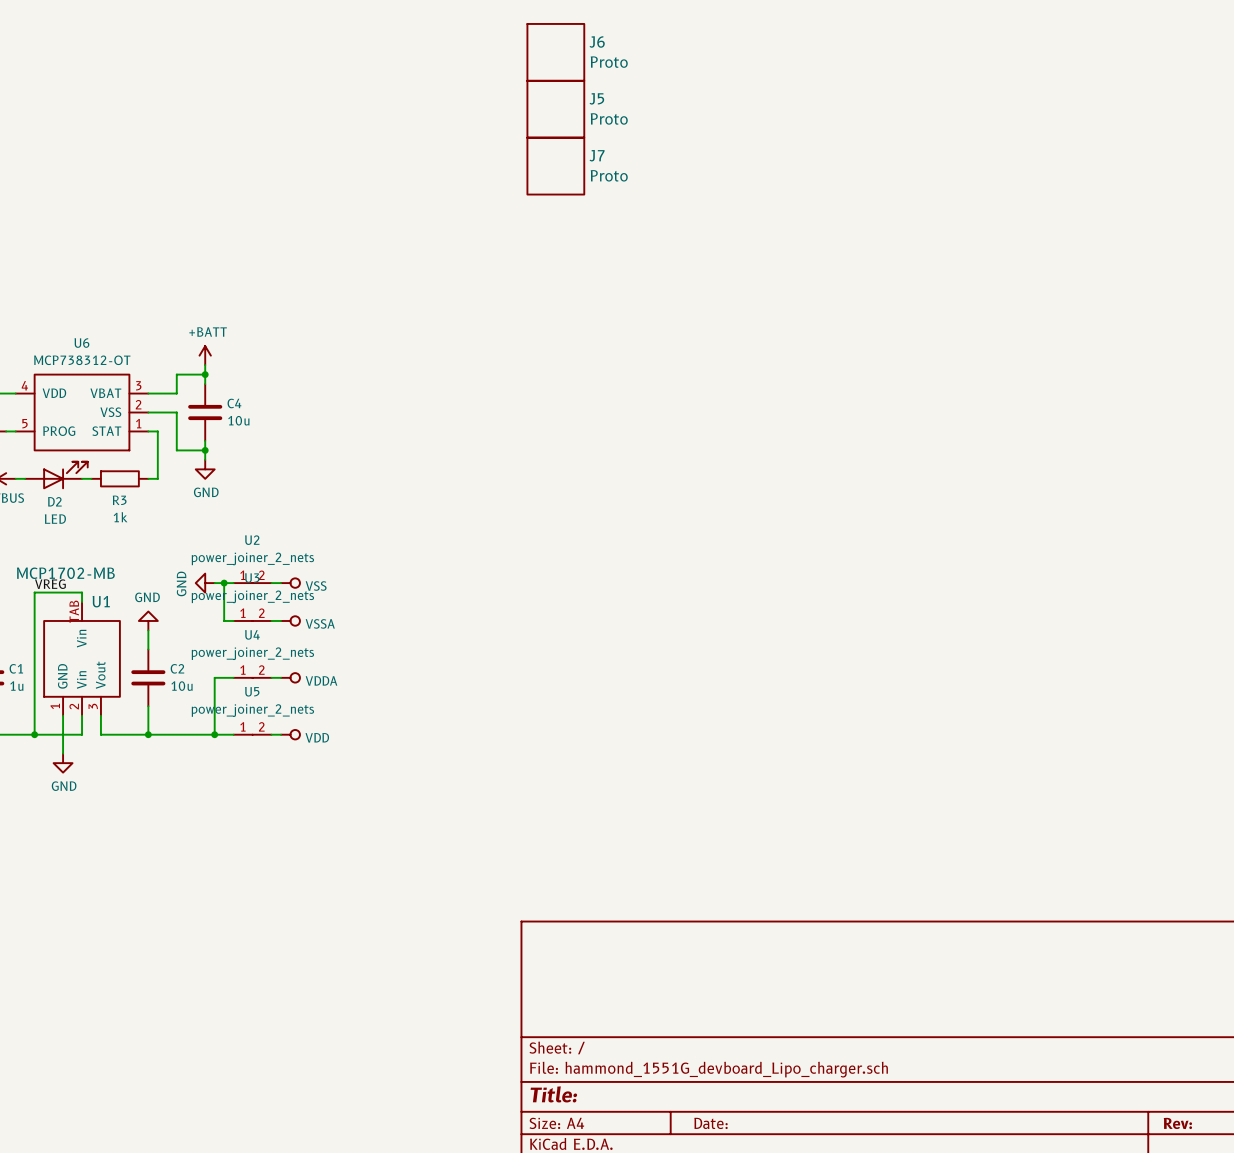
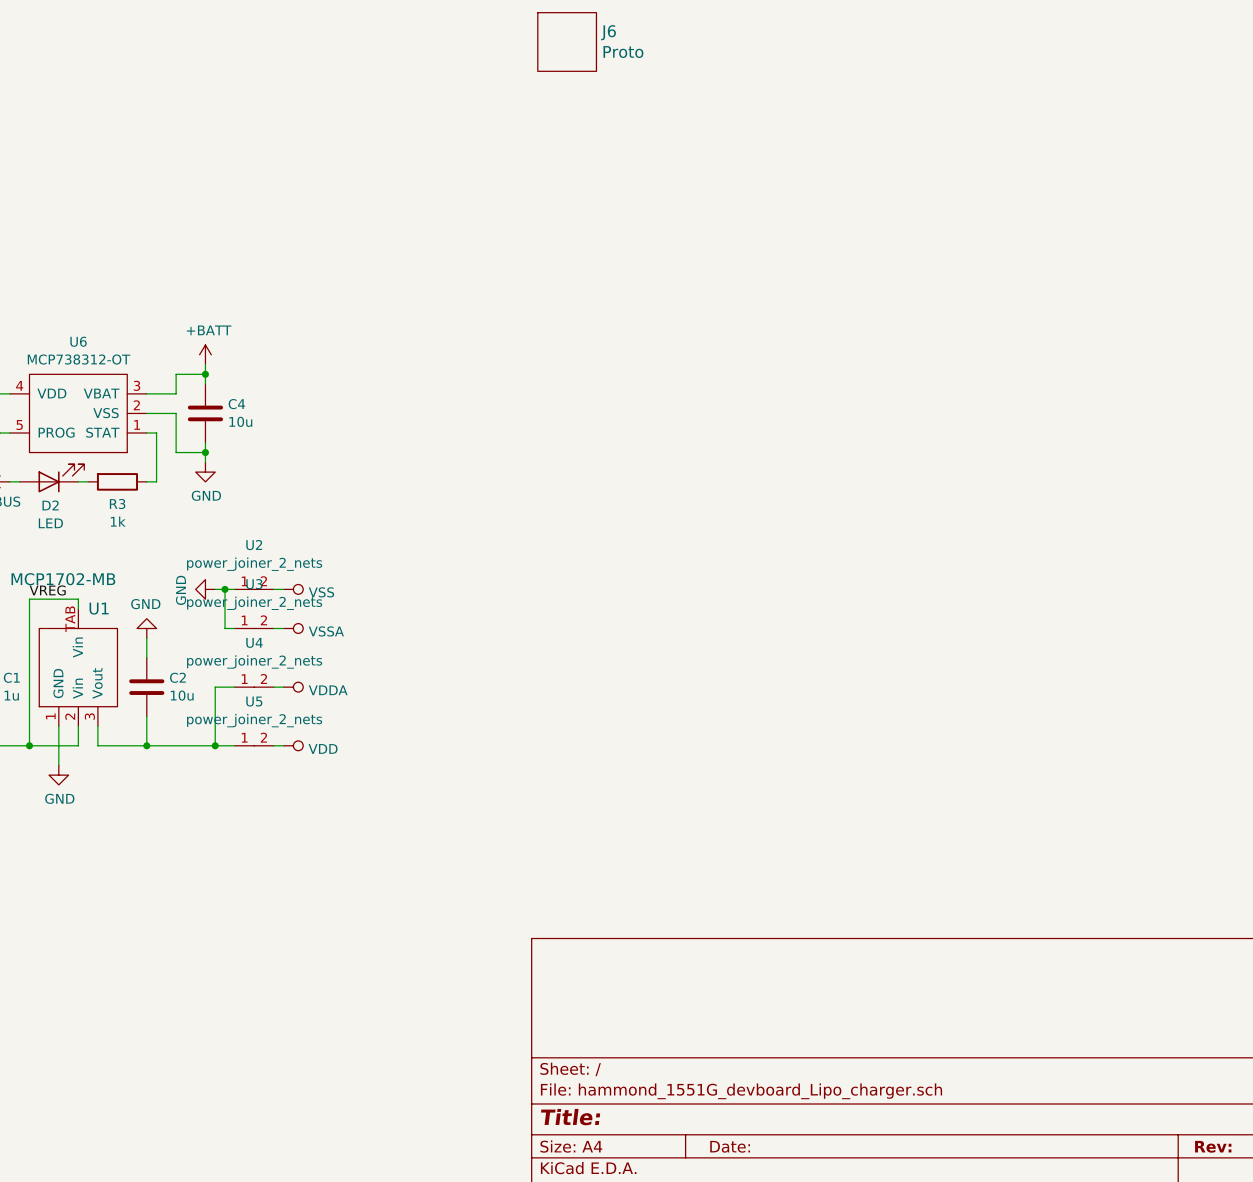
J5: Proto (555, 109) -> none
J7: Proto (555, 166) -> none

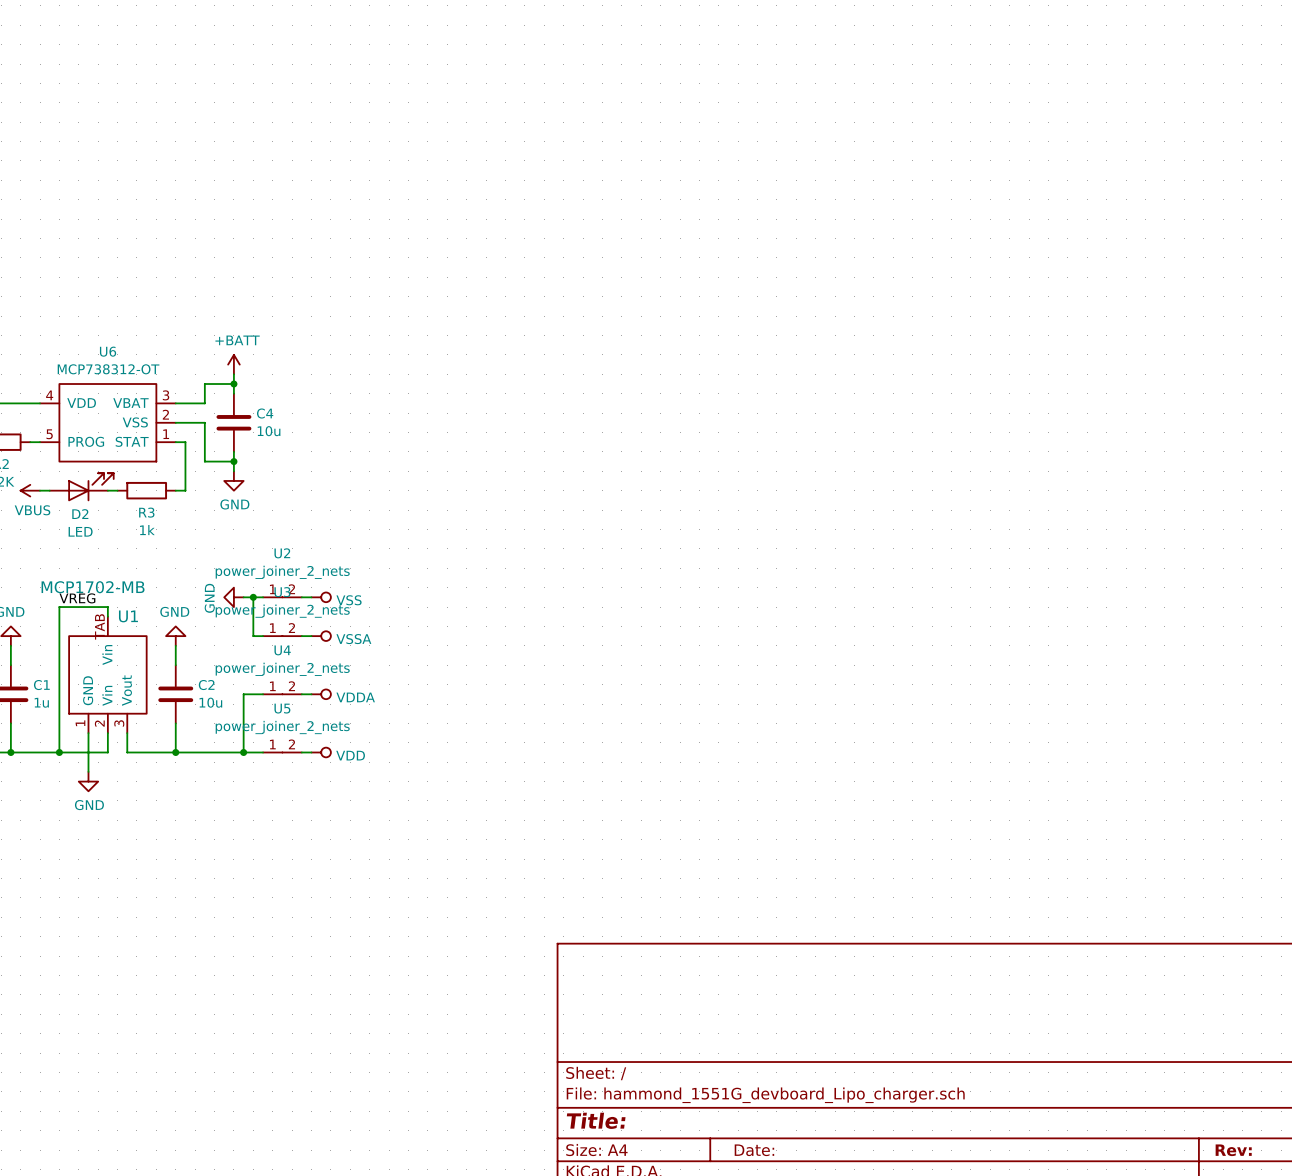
J6: Proto (567, 41) -> none

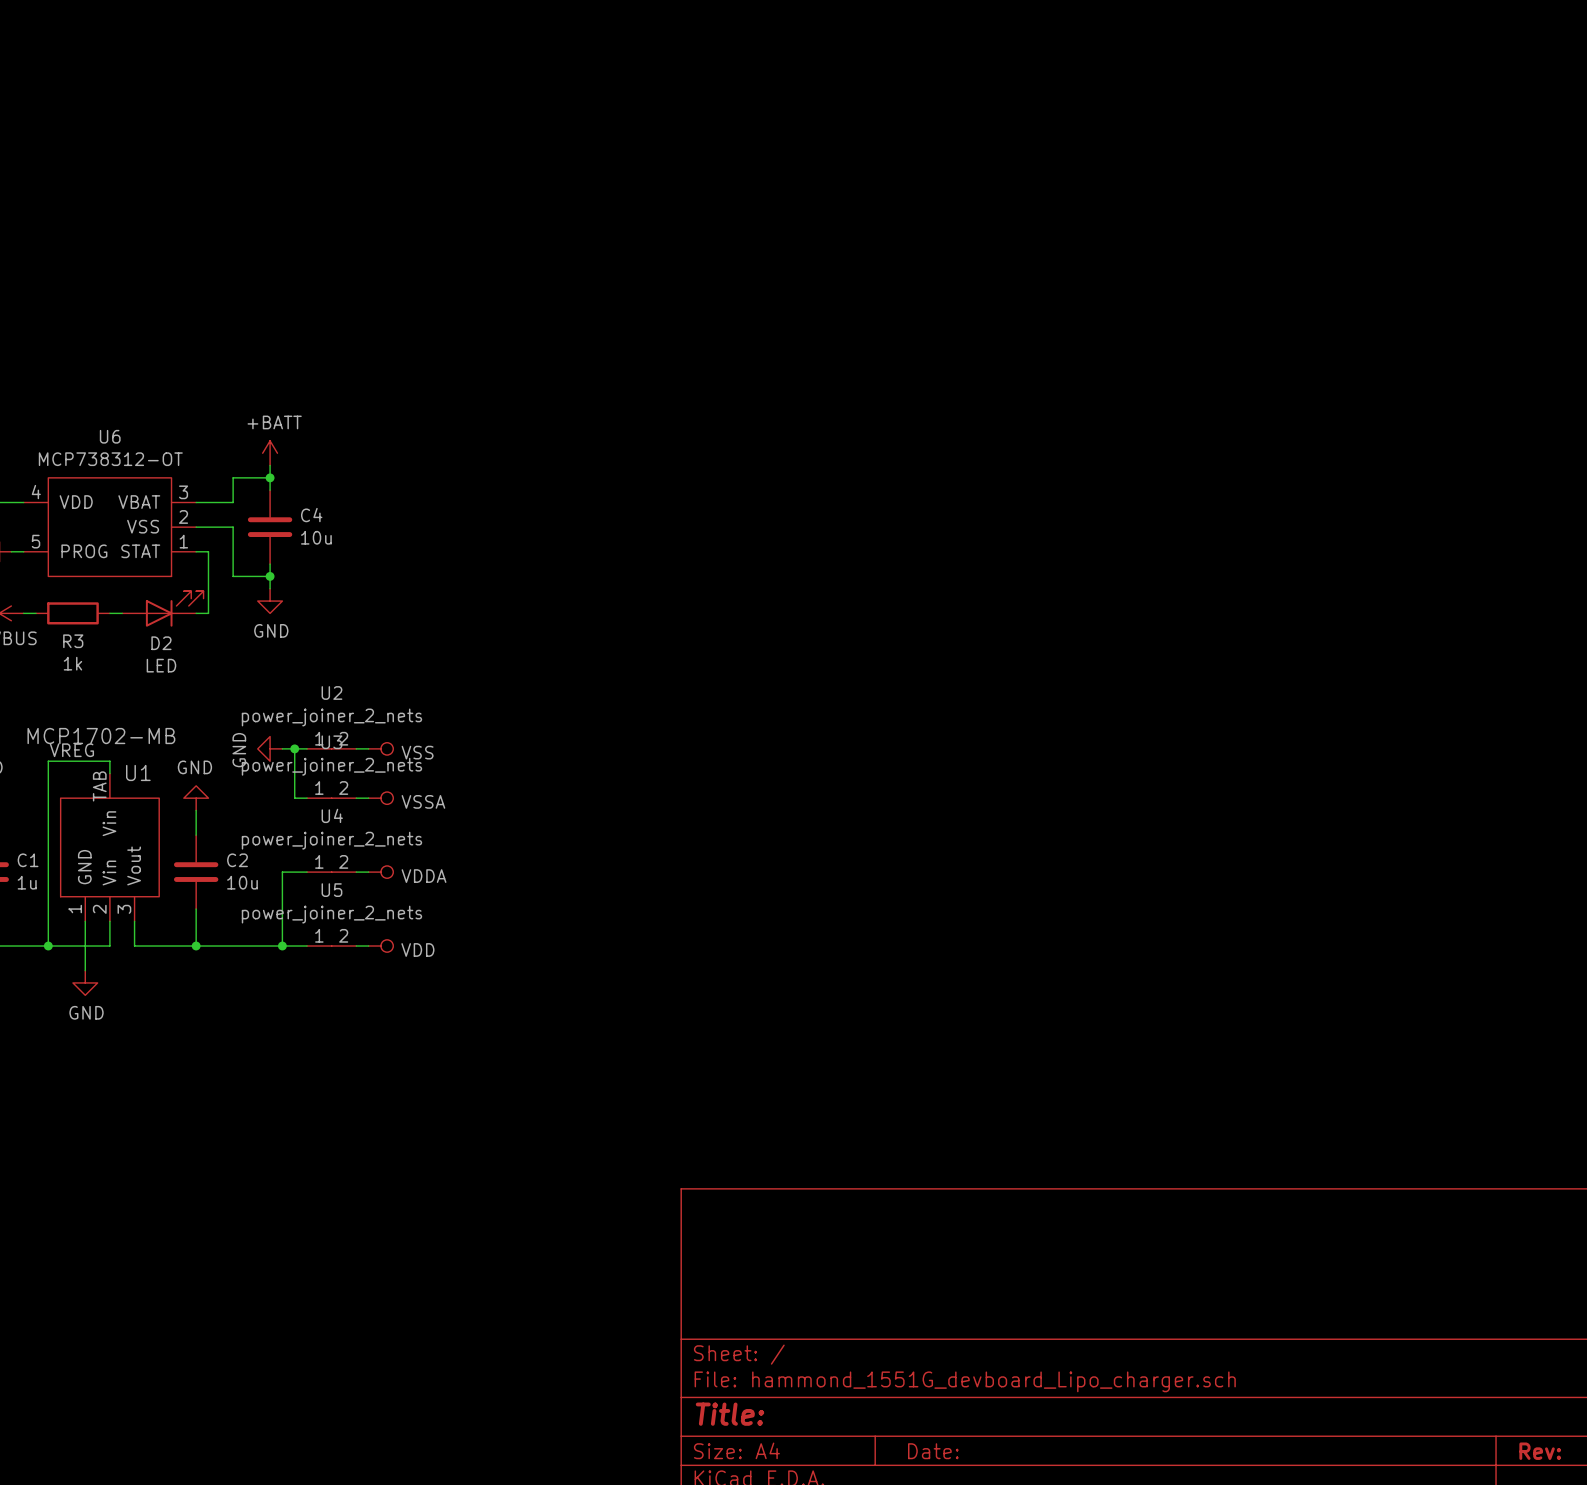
D2 position: (81, 487) -> (162, 608)
R3 position: (146, 490) -> (72, 613)

